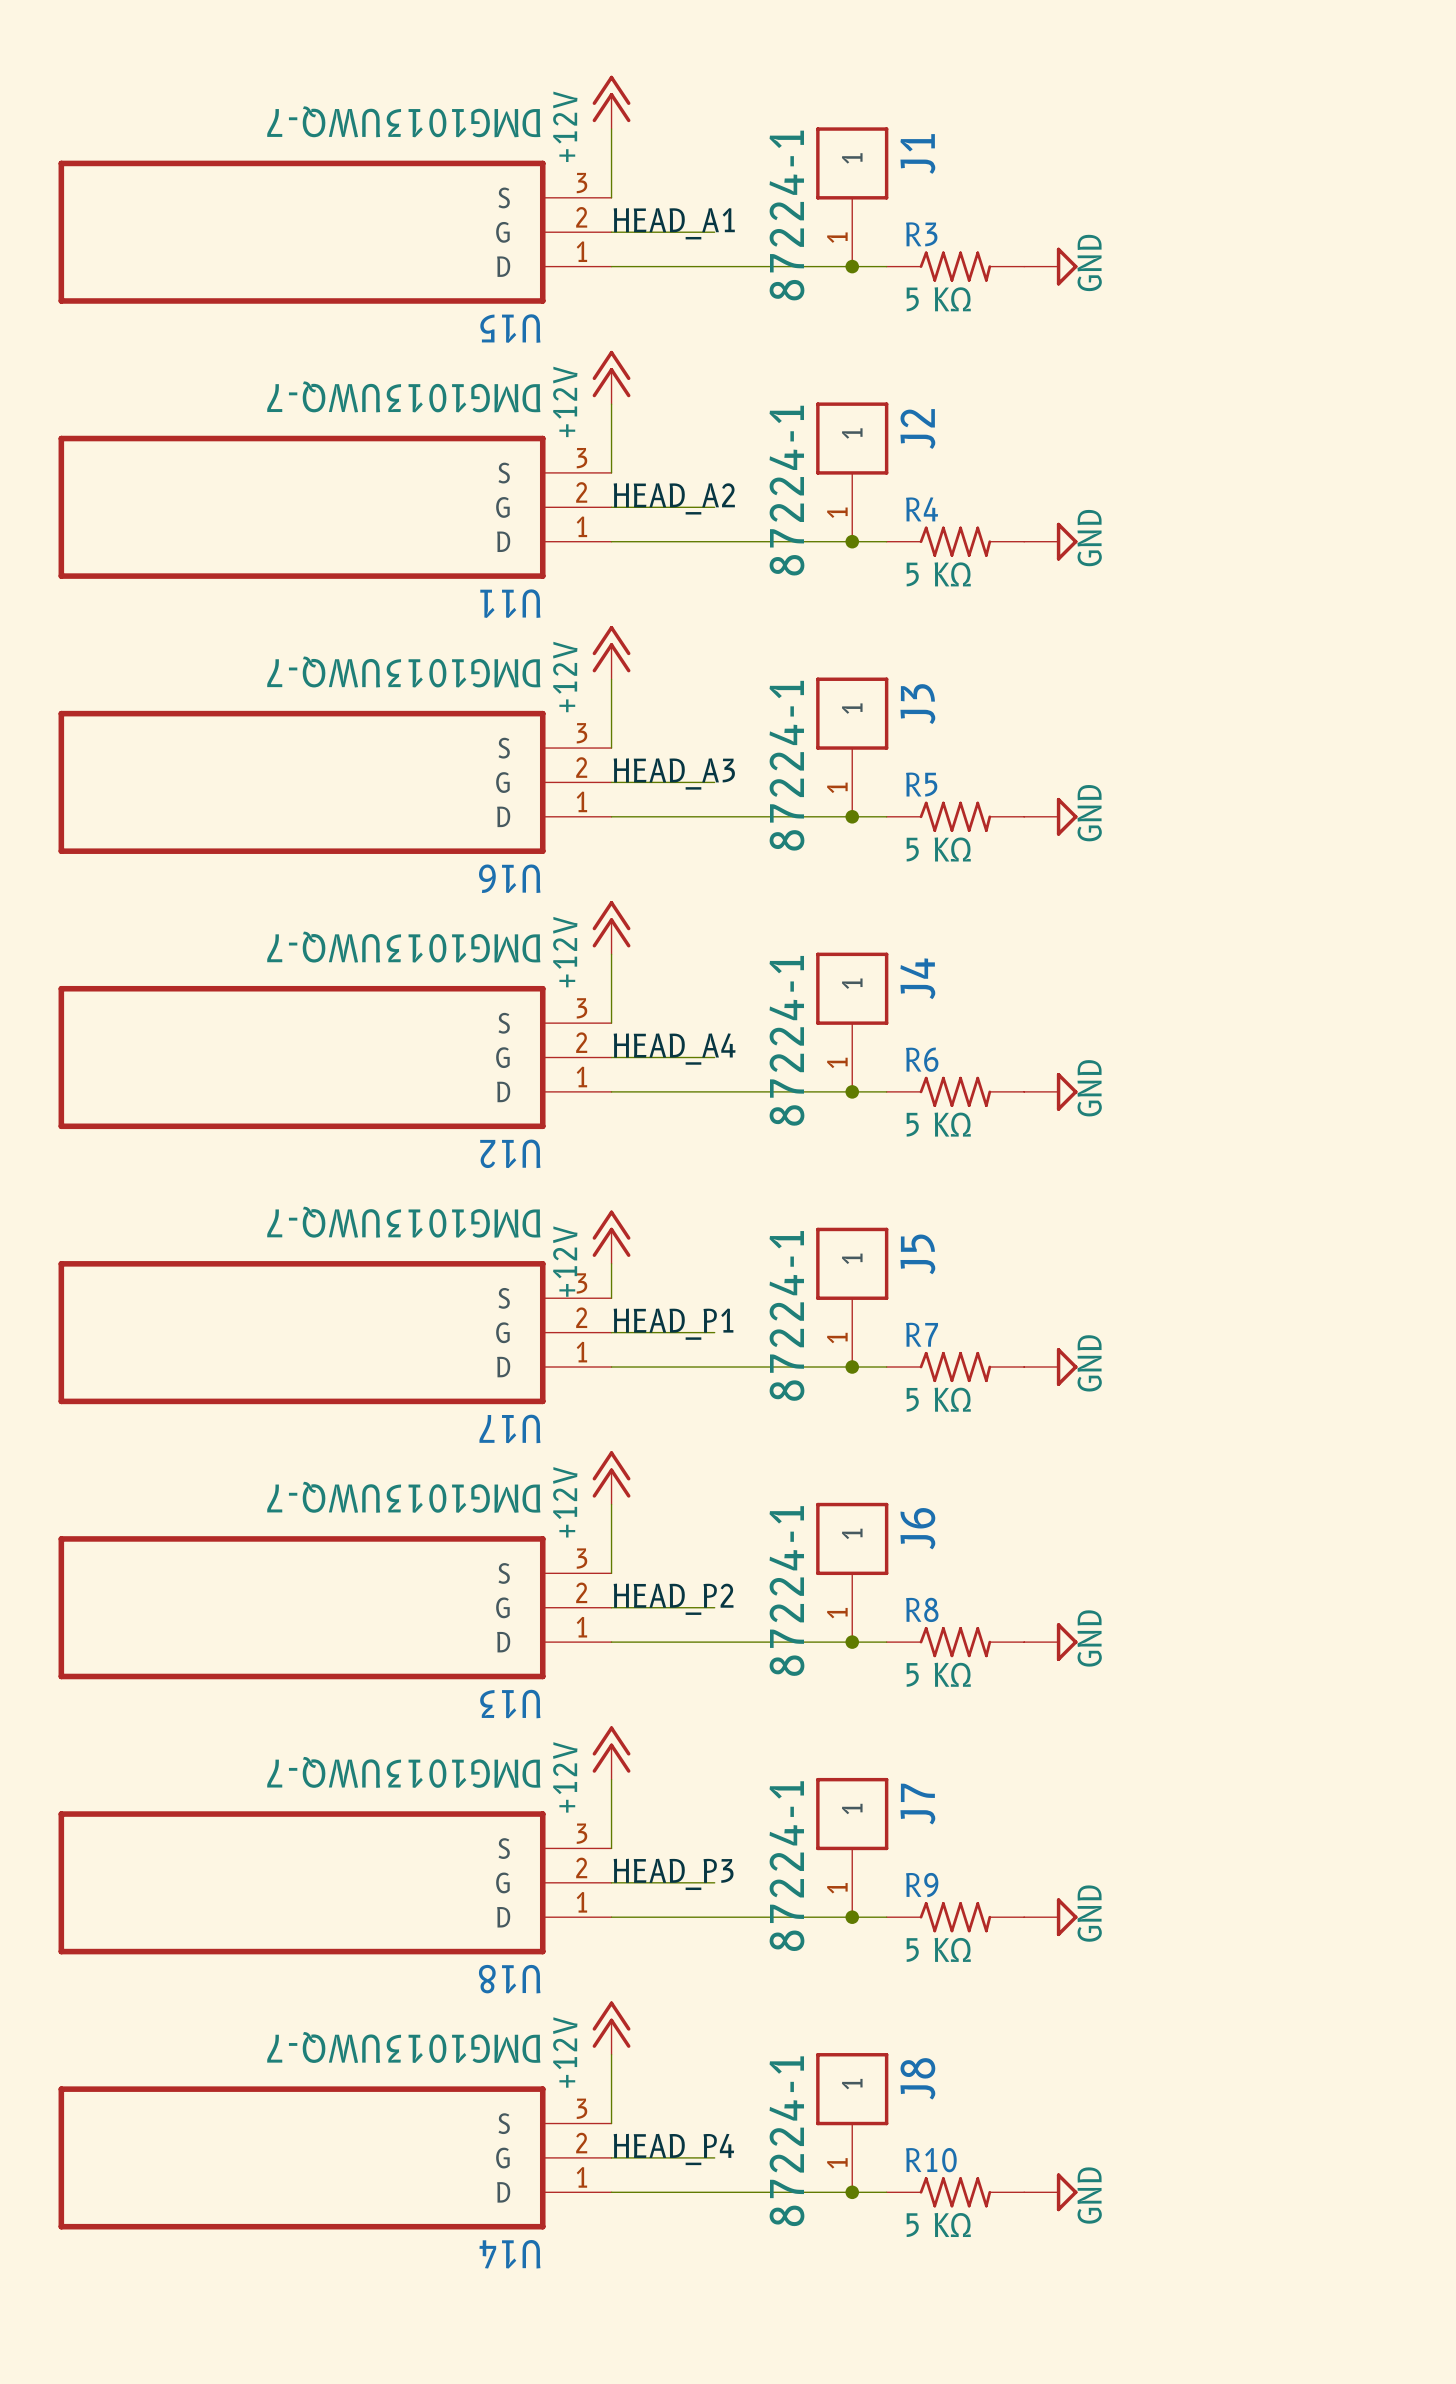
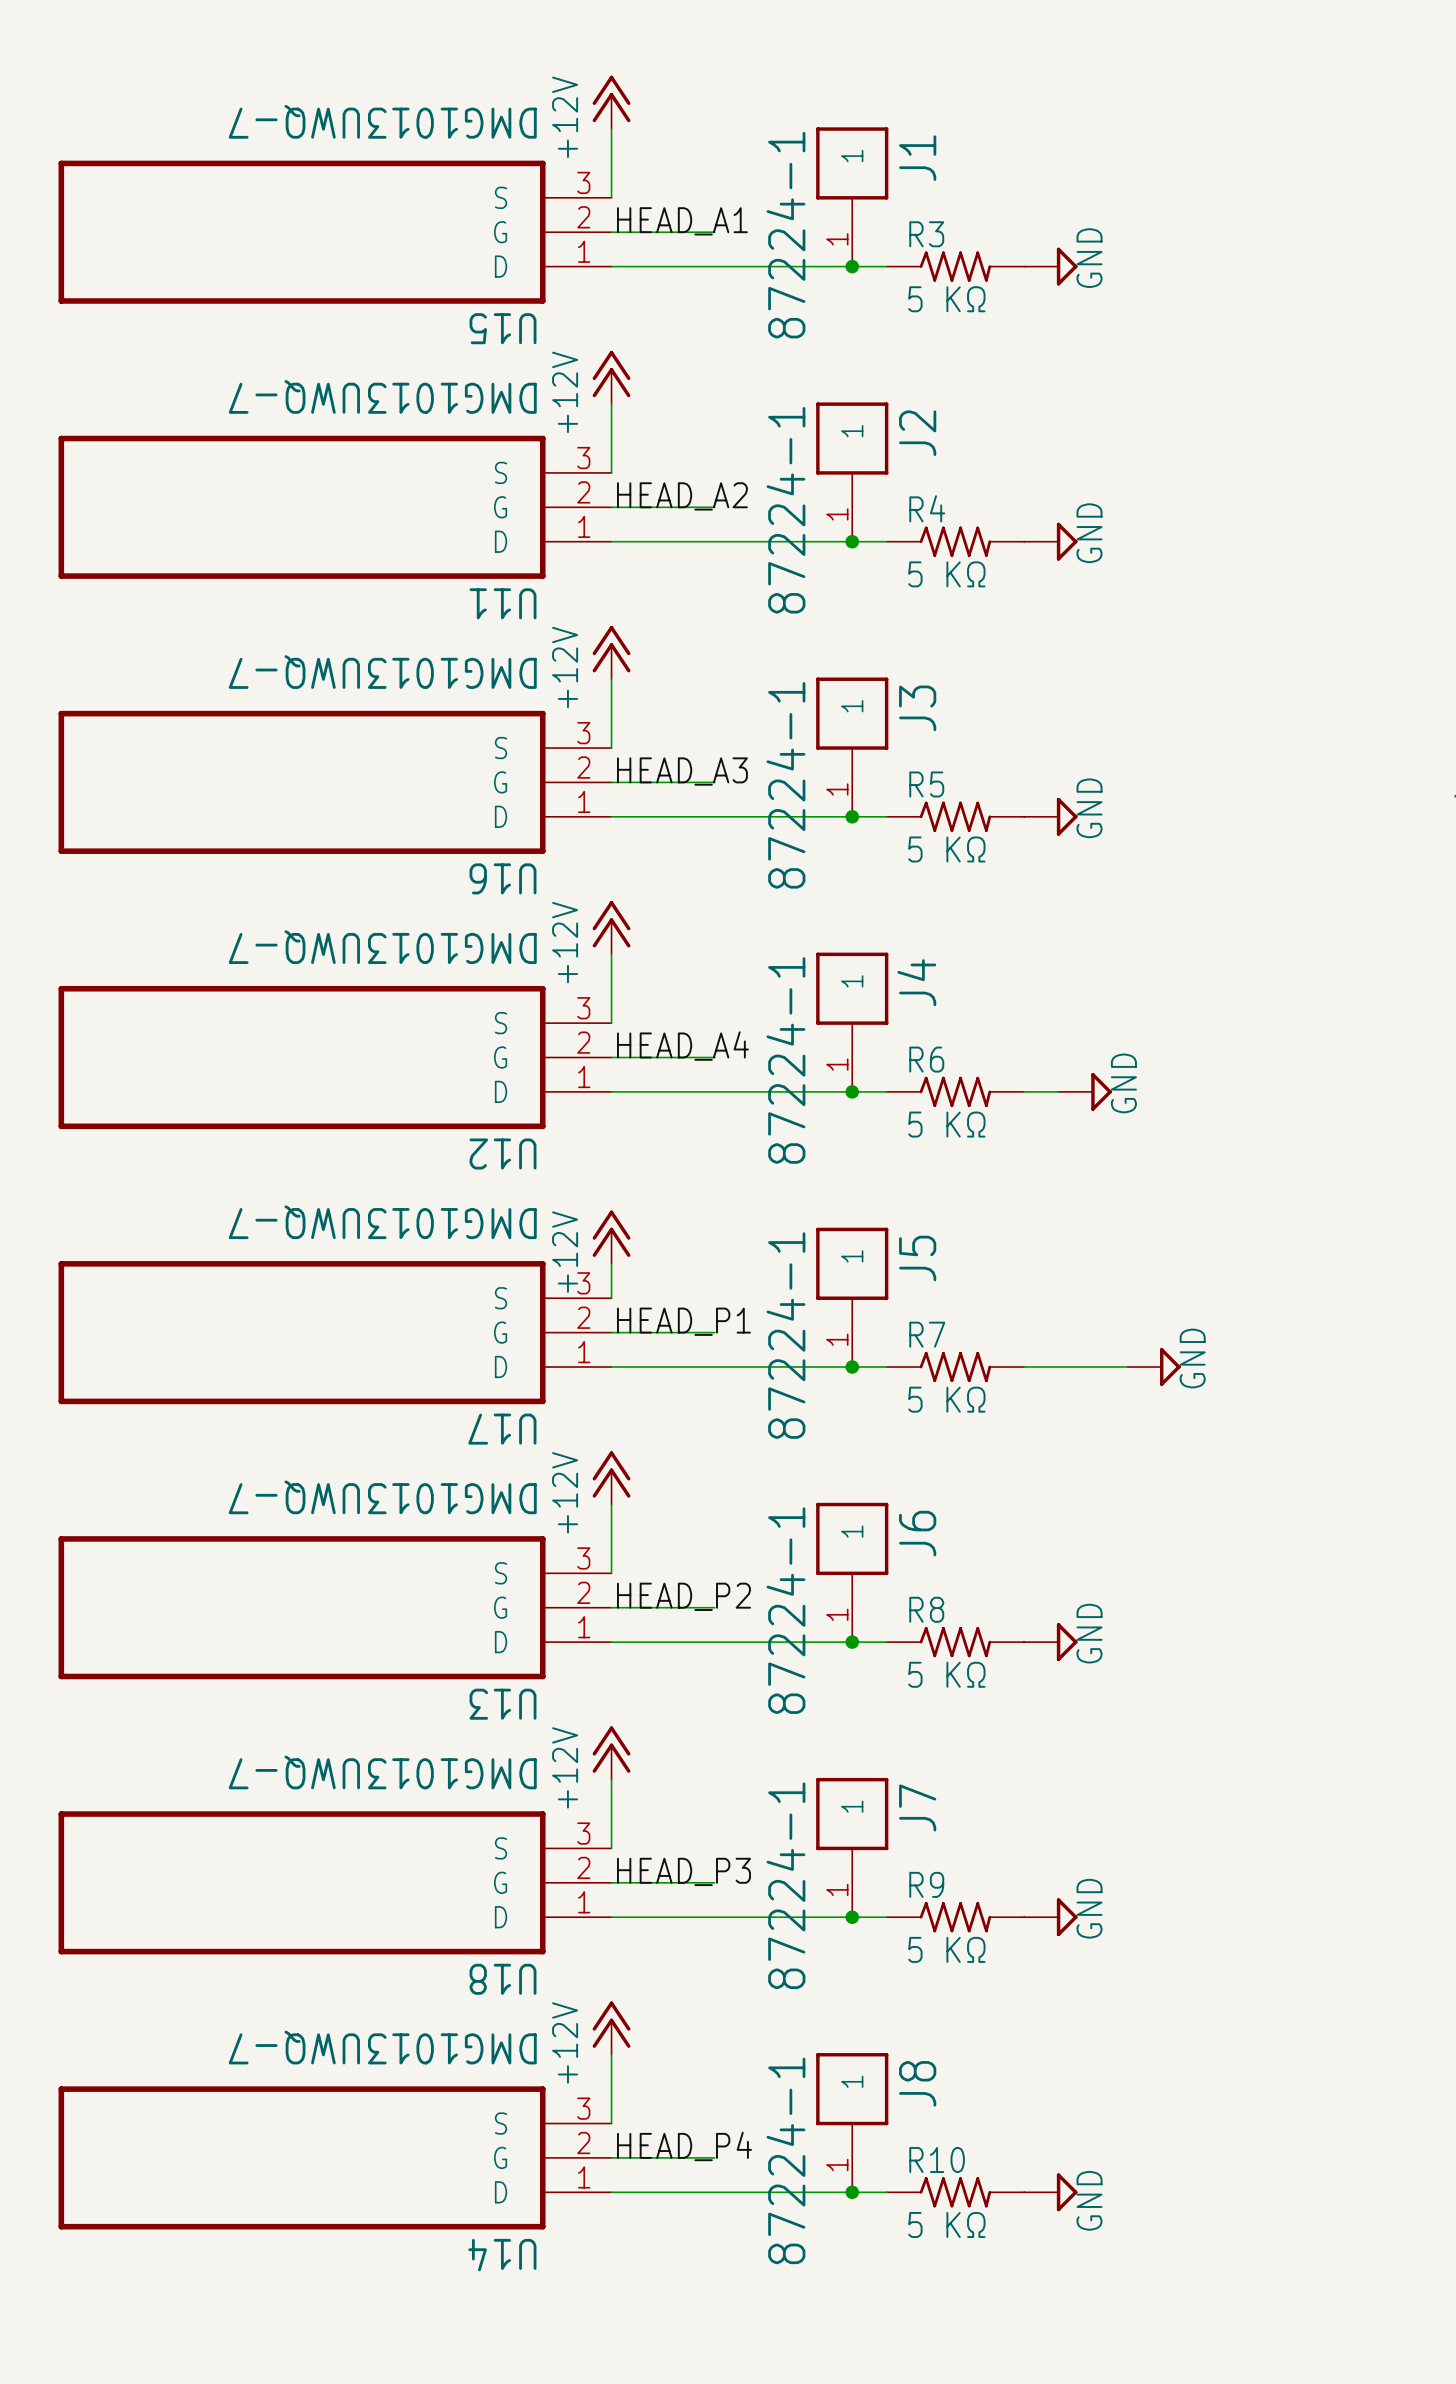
power symbol position: GND (1050, 1091) -> GND (1085, 1091)
wire: none -> (1024, 1367) (1127, 1367)
power symbol position: GND (1050, 1367) -> GND (1153, 1367)

